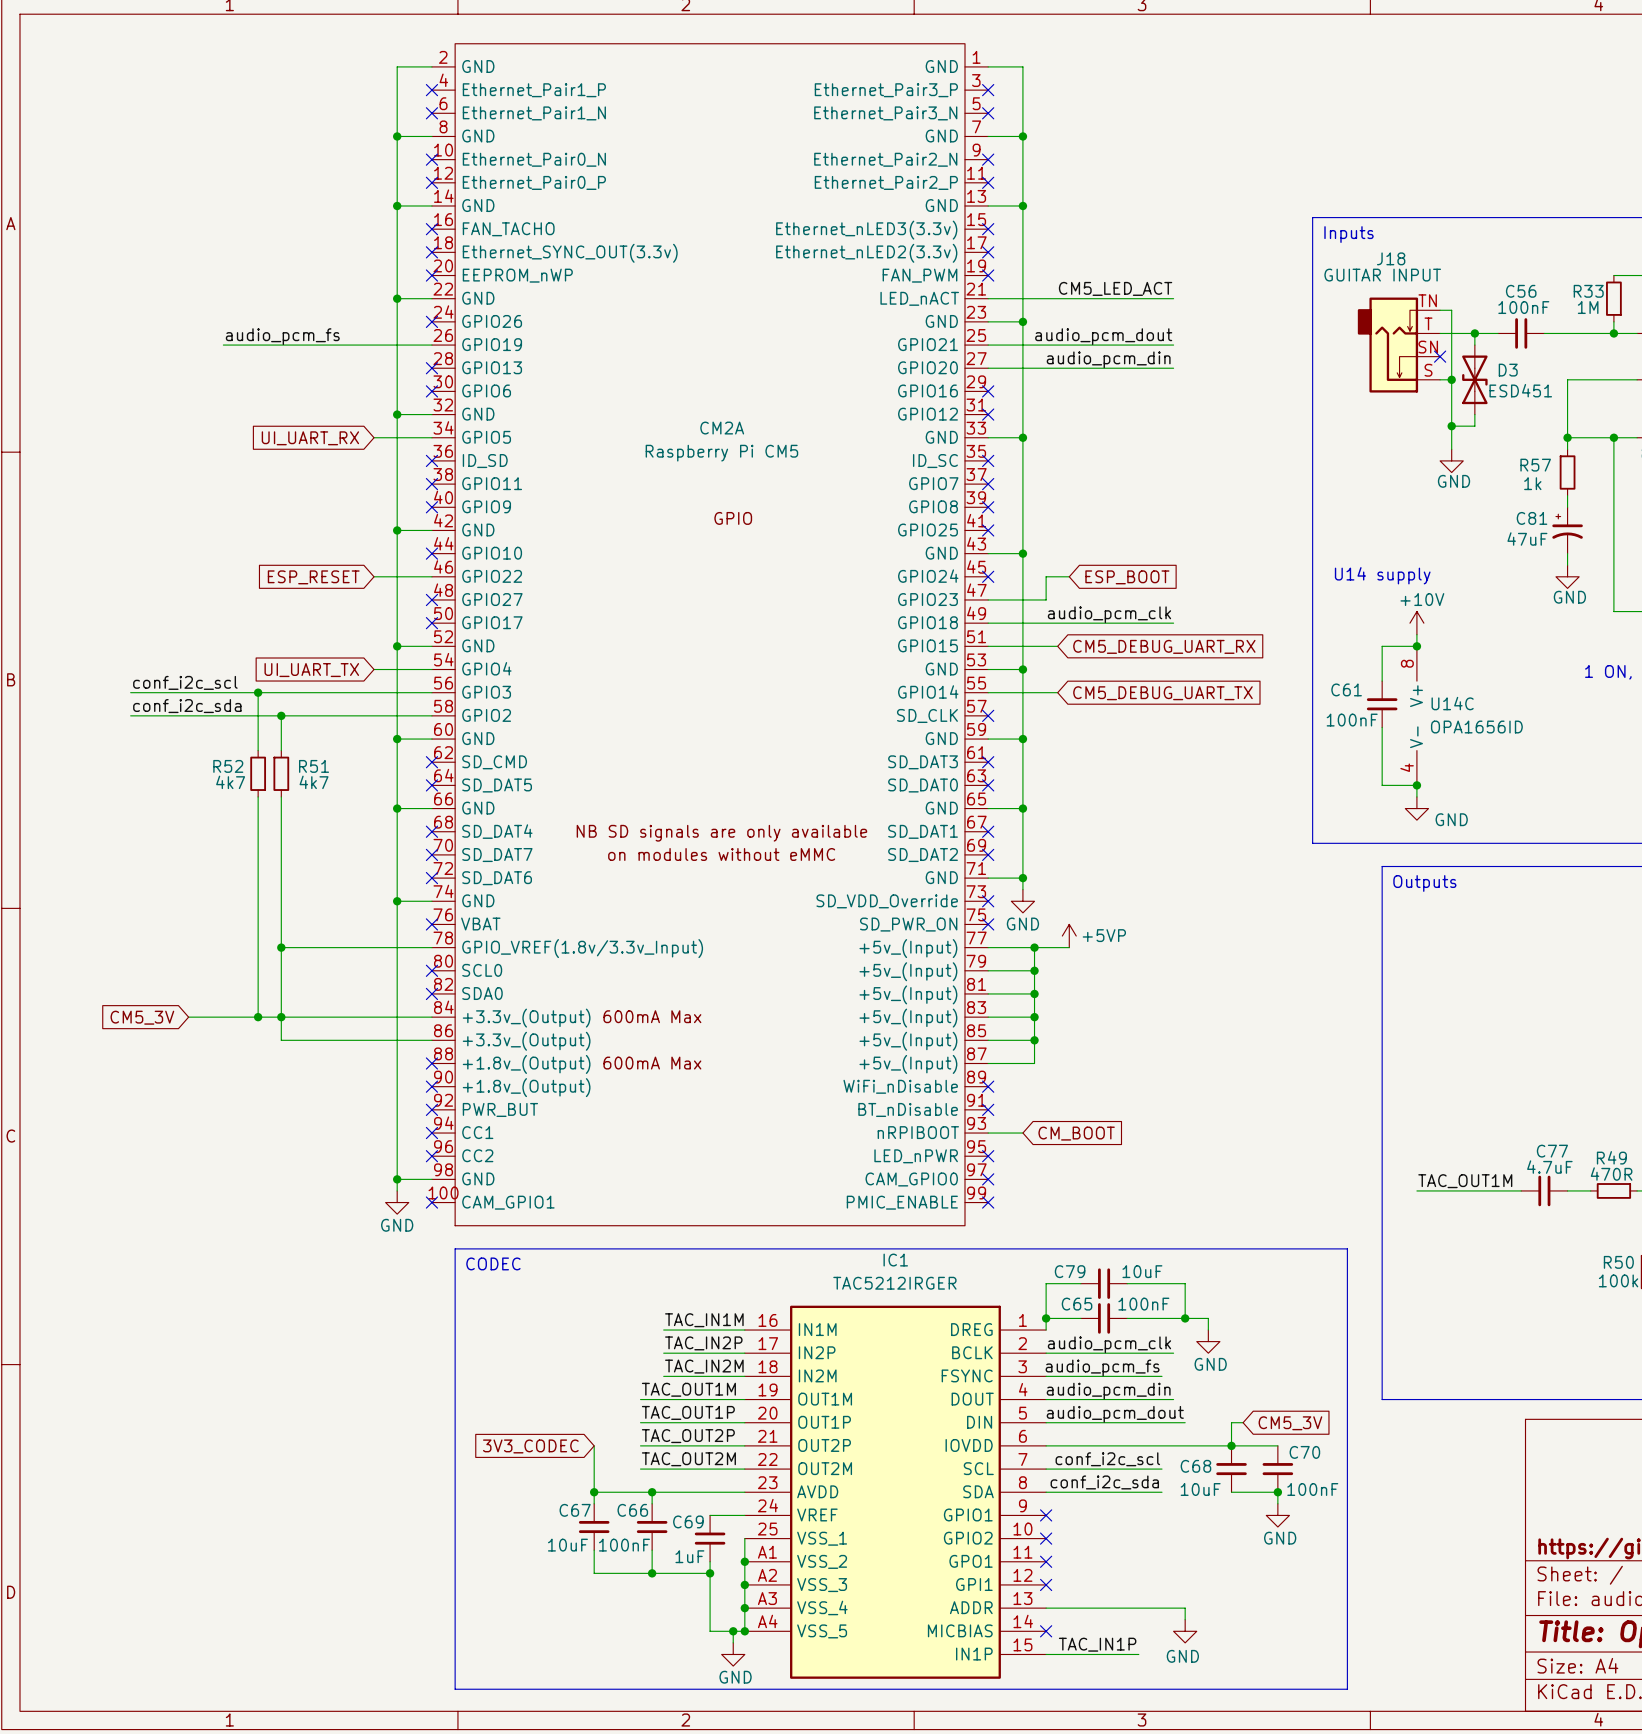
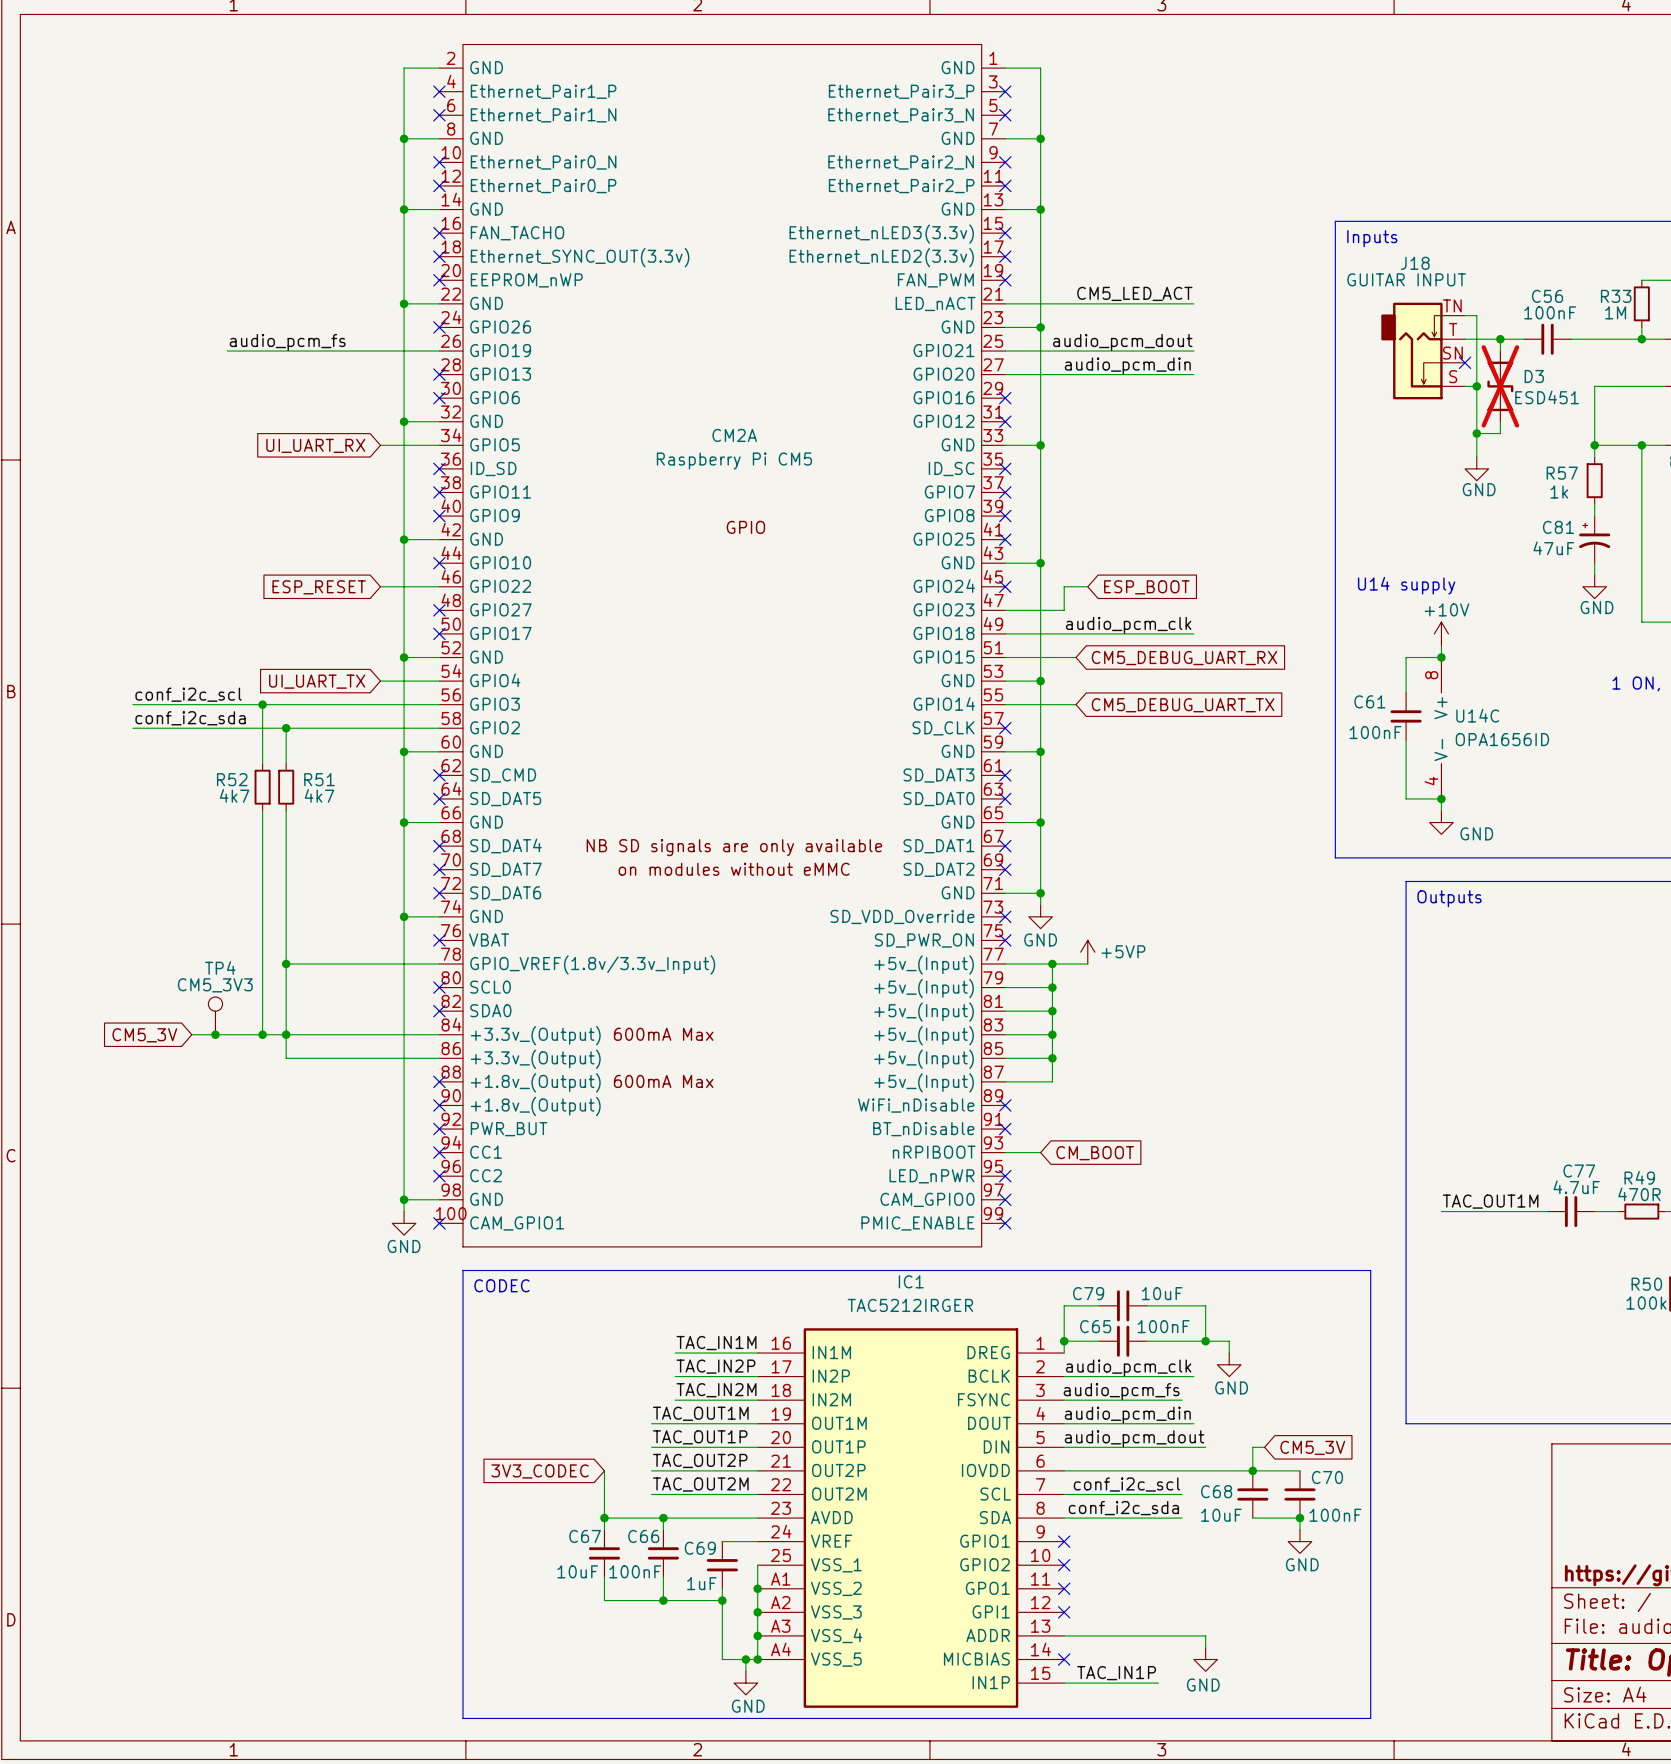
D3 do-not-place cross: none -> (1500, 386)
TP4: none -> CM5_3V3 (215, 1015)
junction: none -> (215, 1034)

